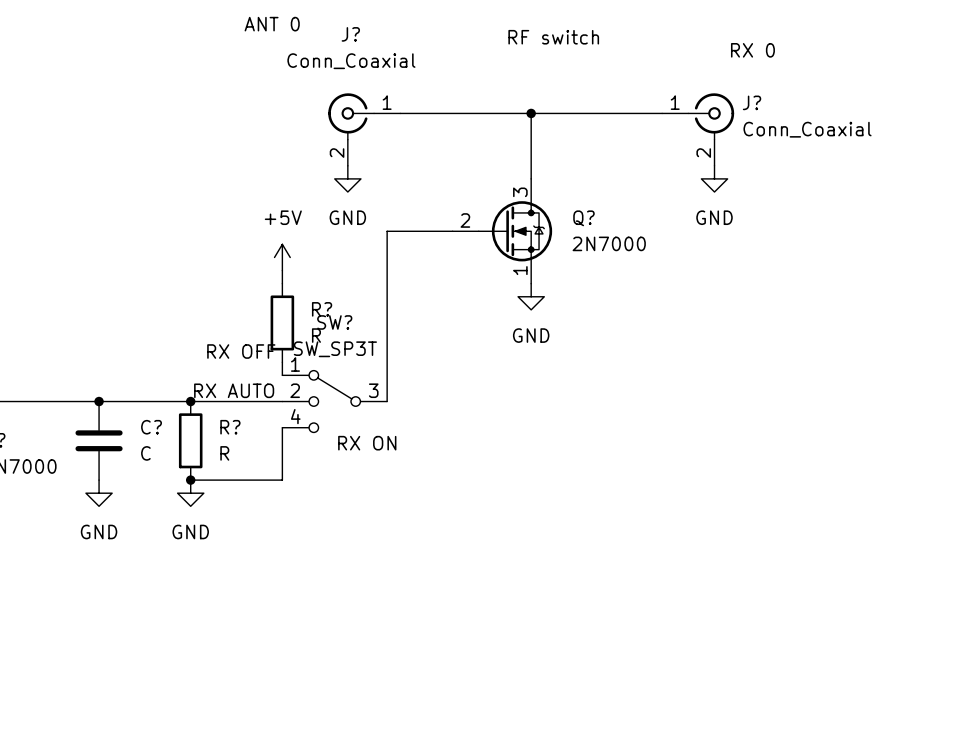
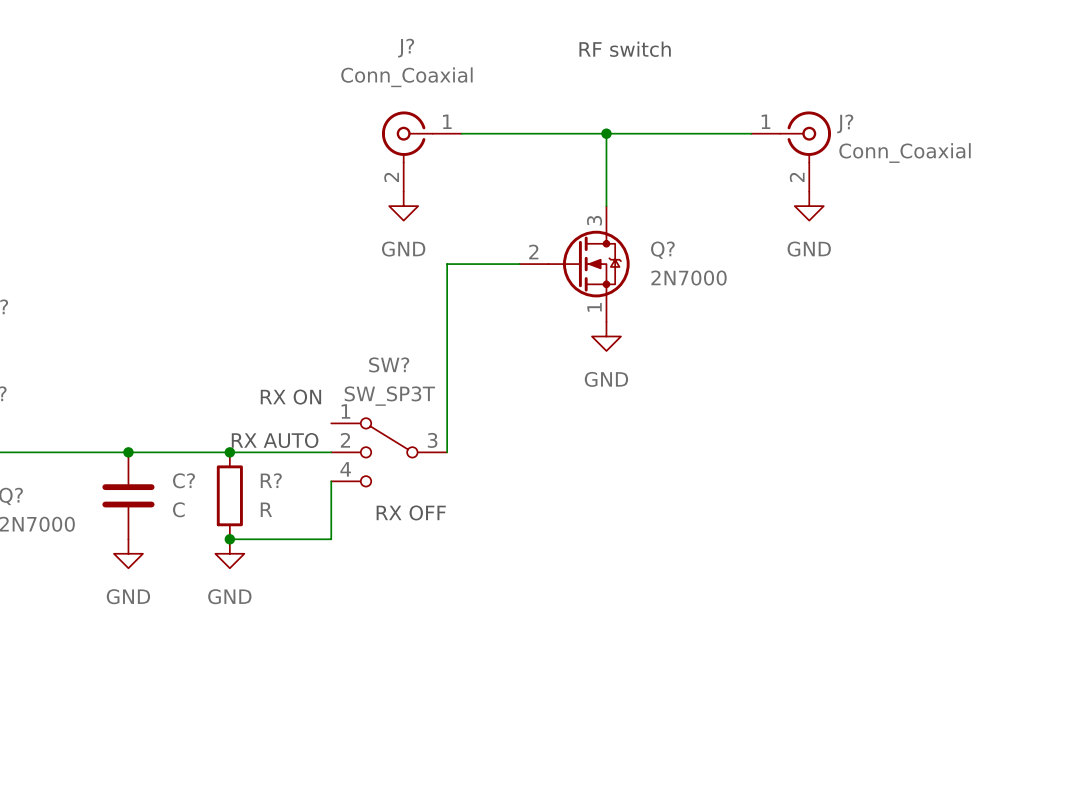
text: ANT 0 (272, 24) -> none
text: RX 0 (752, 50) -> none
power symbol: +5V (282, 257) -> none
wire: (282, 270) (282, 283) -> none
R?: R (282, 322) -> none
text position: RX OFF (241, 351) -> RX OFF (411, 512)
wire: (282, 362) (282, 375) -> none
text position: RX ON (367, 443) -> RX ON (290, 397)

